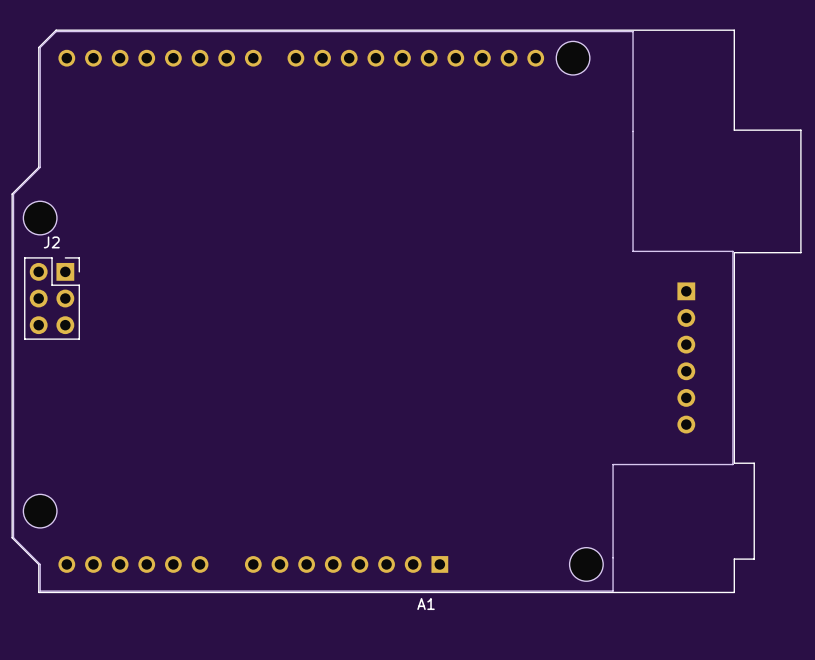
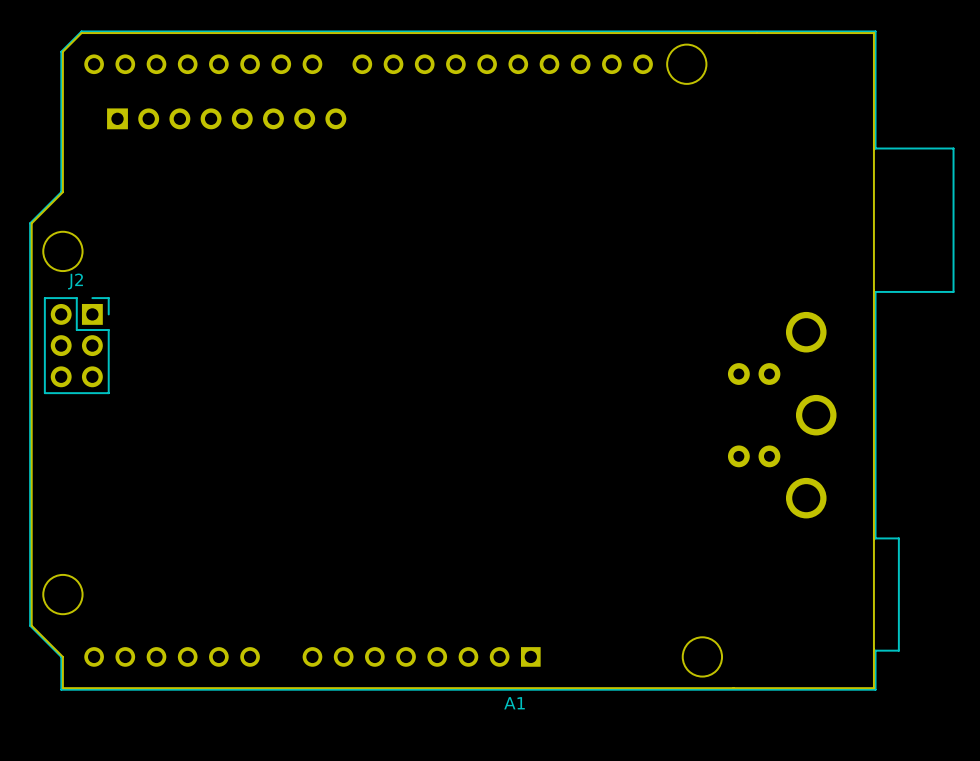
board edge: (633, 31) (633, 251) (732, 251) -> (756, 33) (873, 33) (873, 290)
part: none -> (226, 118)
part: none -> (782, 415)
part: (686, 357) -> none
board edge: (732, 464) (613, 464) (613, 591) -> (873, 539) (873, 688) (733, 688)

